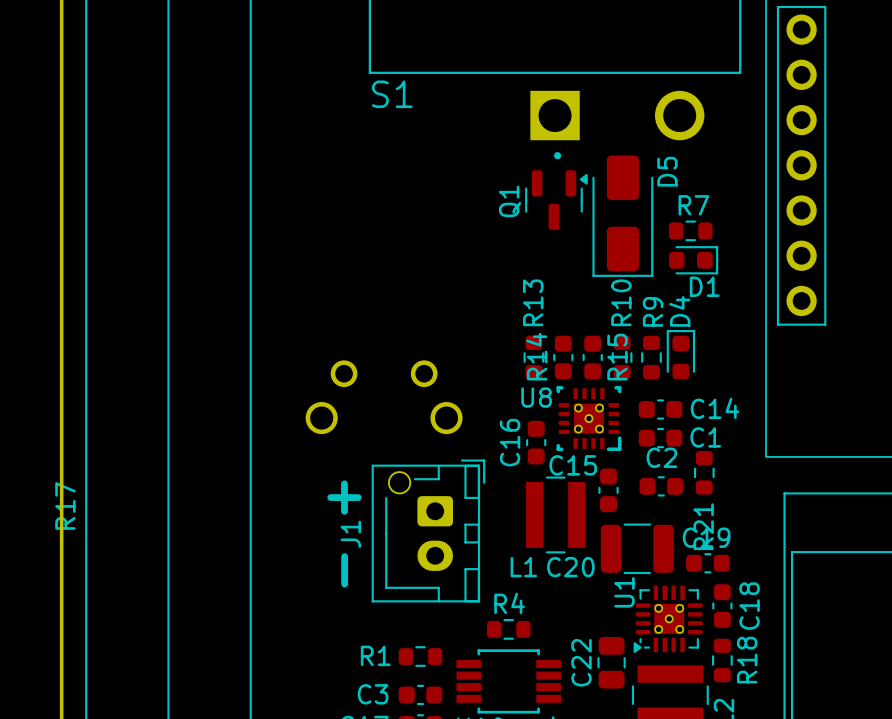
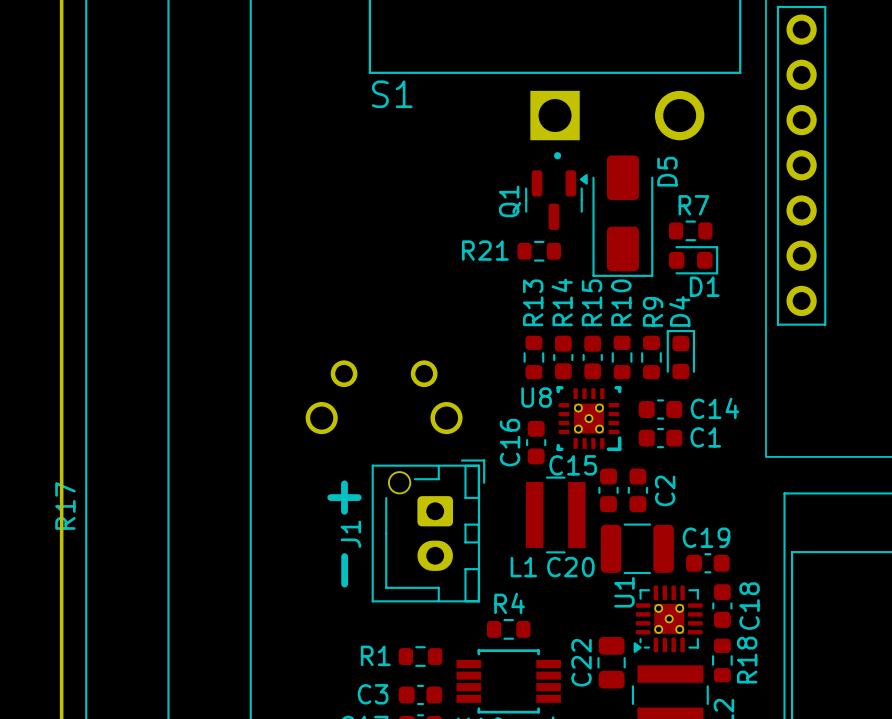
R14 name position: R14 (536, 356) -> R14 (562, 302)
R15 name position: R15 (617, 357) -> R15 (592, 302)
R21 rotation: 0° (704, 472) -> 90° clockwise (539, 251)
R21 position: (704, 472) -> (539, 251)
C2 rotation: 0° (661, 486) -> 90° clockwise (637, 490)

